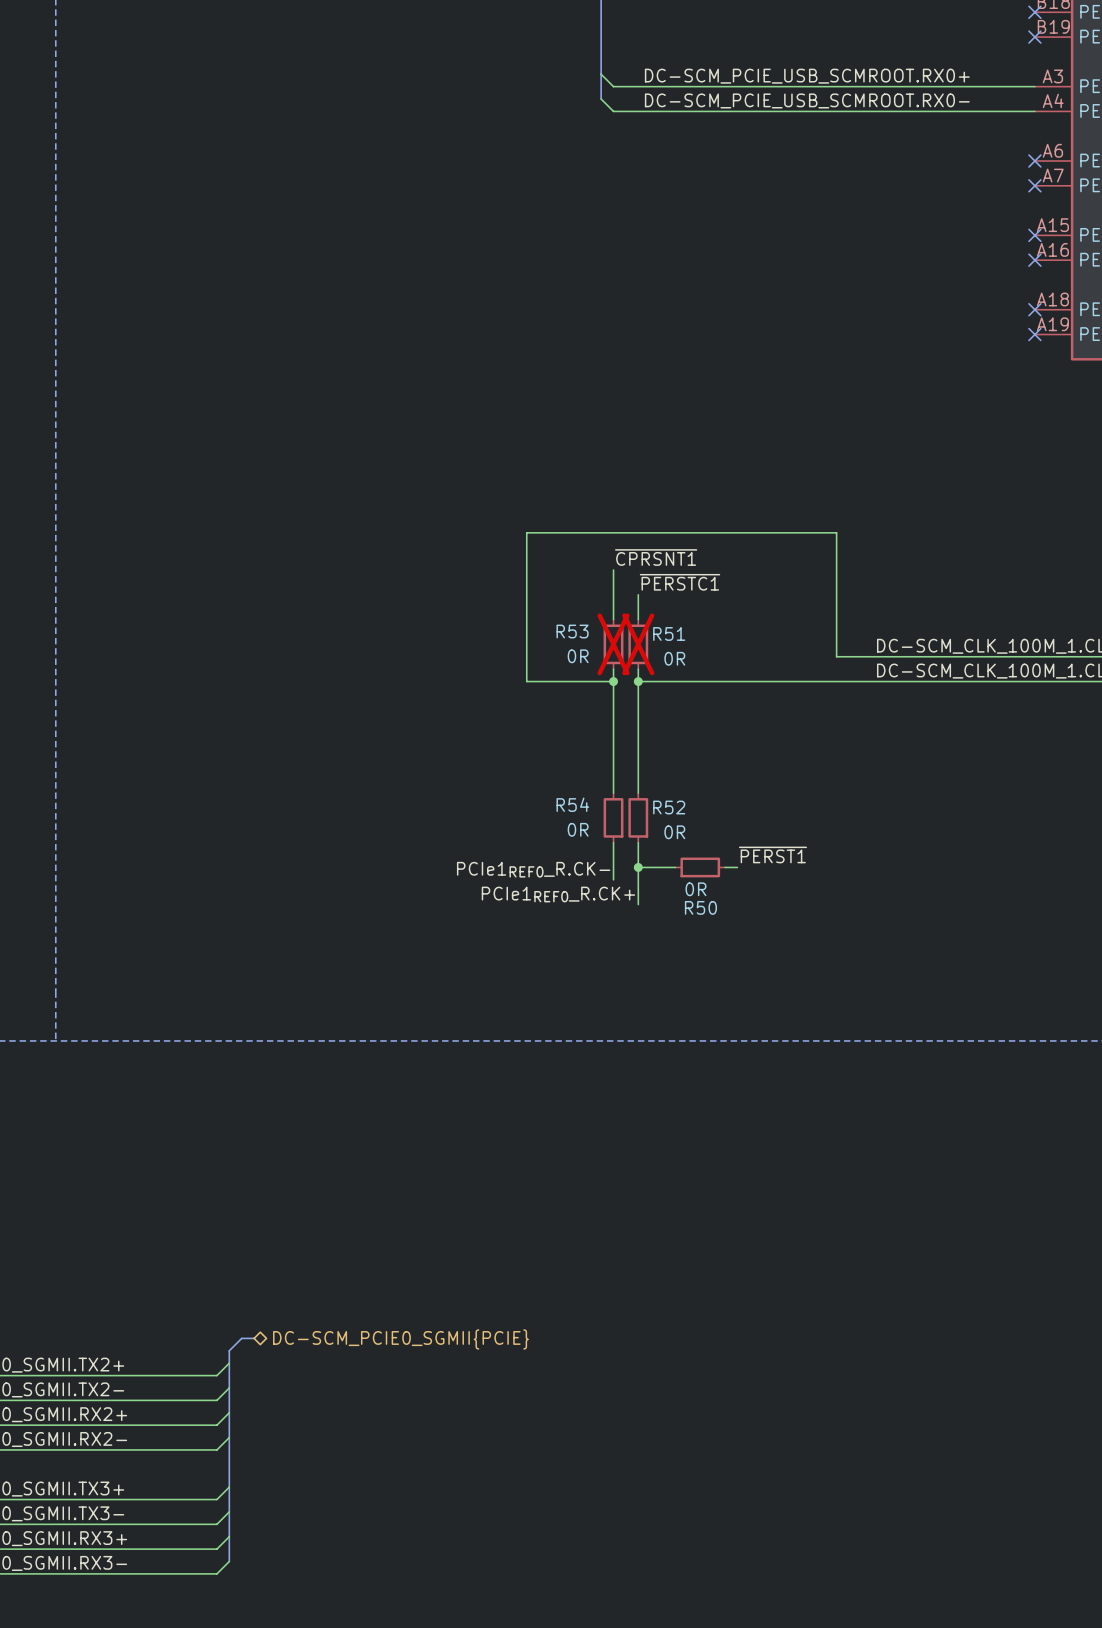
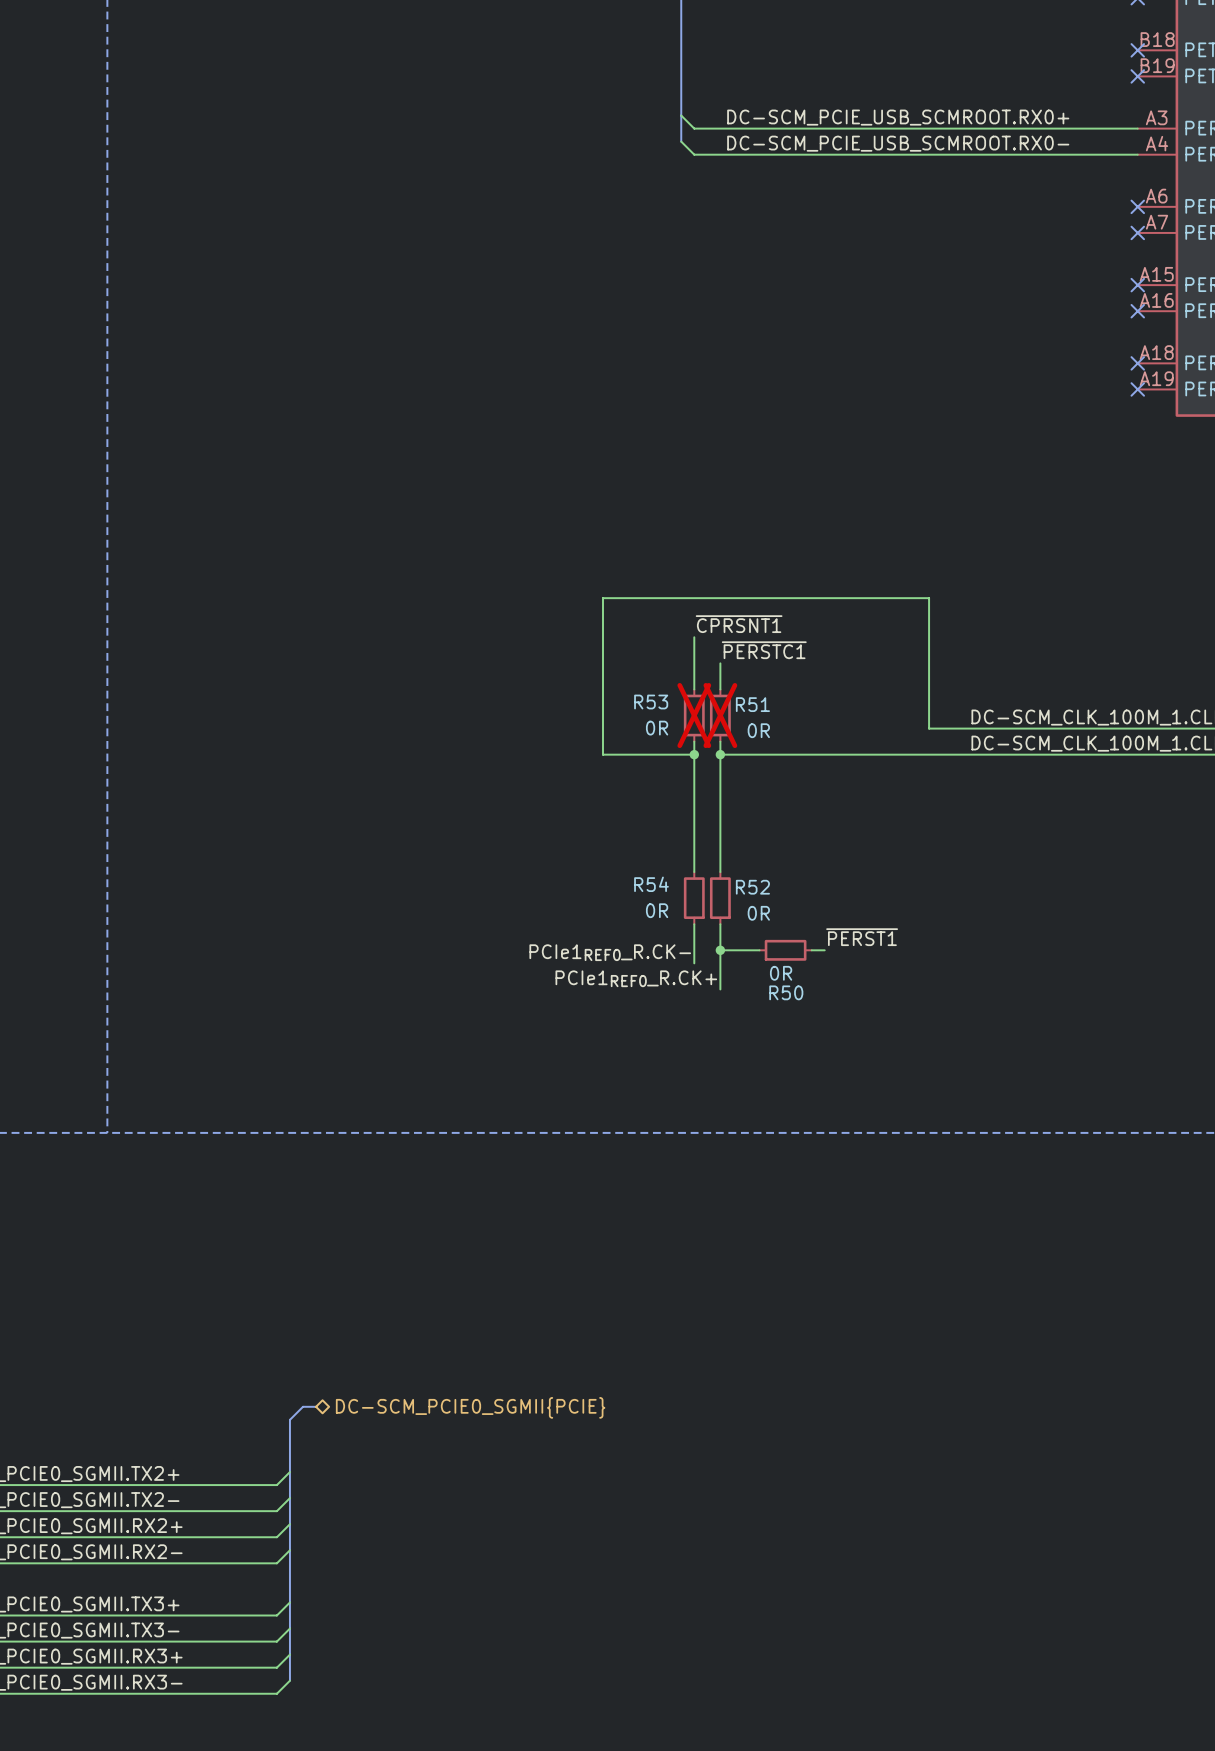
bus: (254, 1338) (241, 1338) (229, 1350) -> (316, 1406) (303, 1406) (289, 1419) (289, 1458)
hierarchical label position: DC-SCM_PCIE0_SGMII{PCIE} (400, 1339) -> DC-SCM_PCIE0_SGMII{PCIE} (470, 1407)

